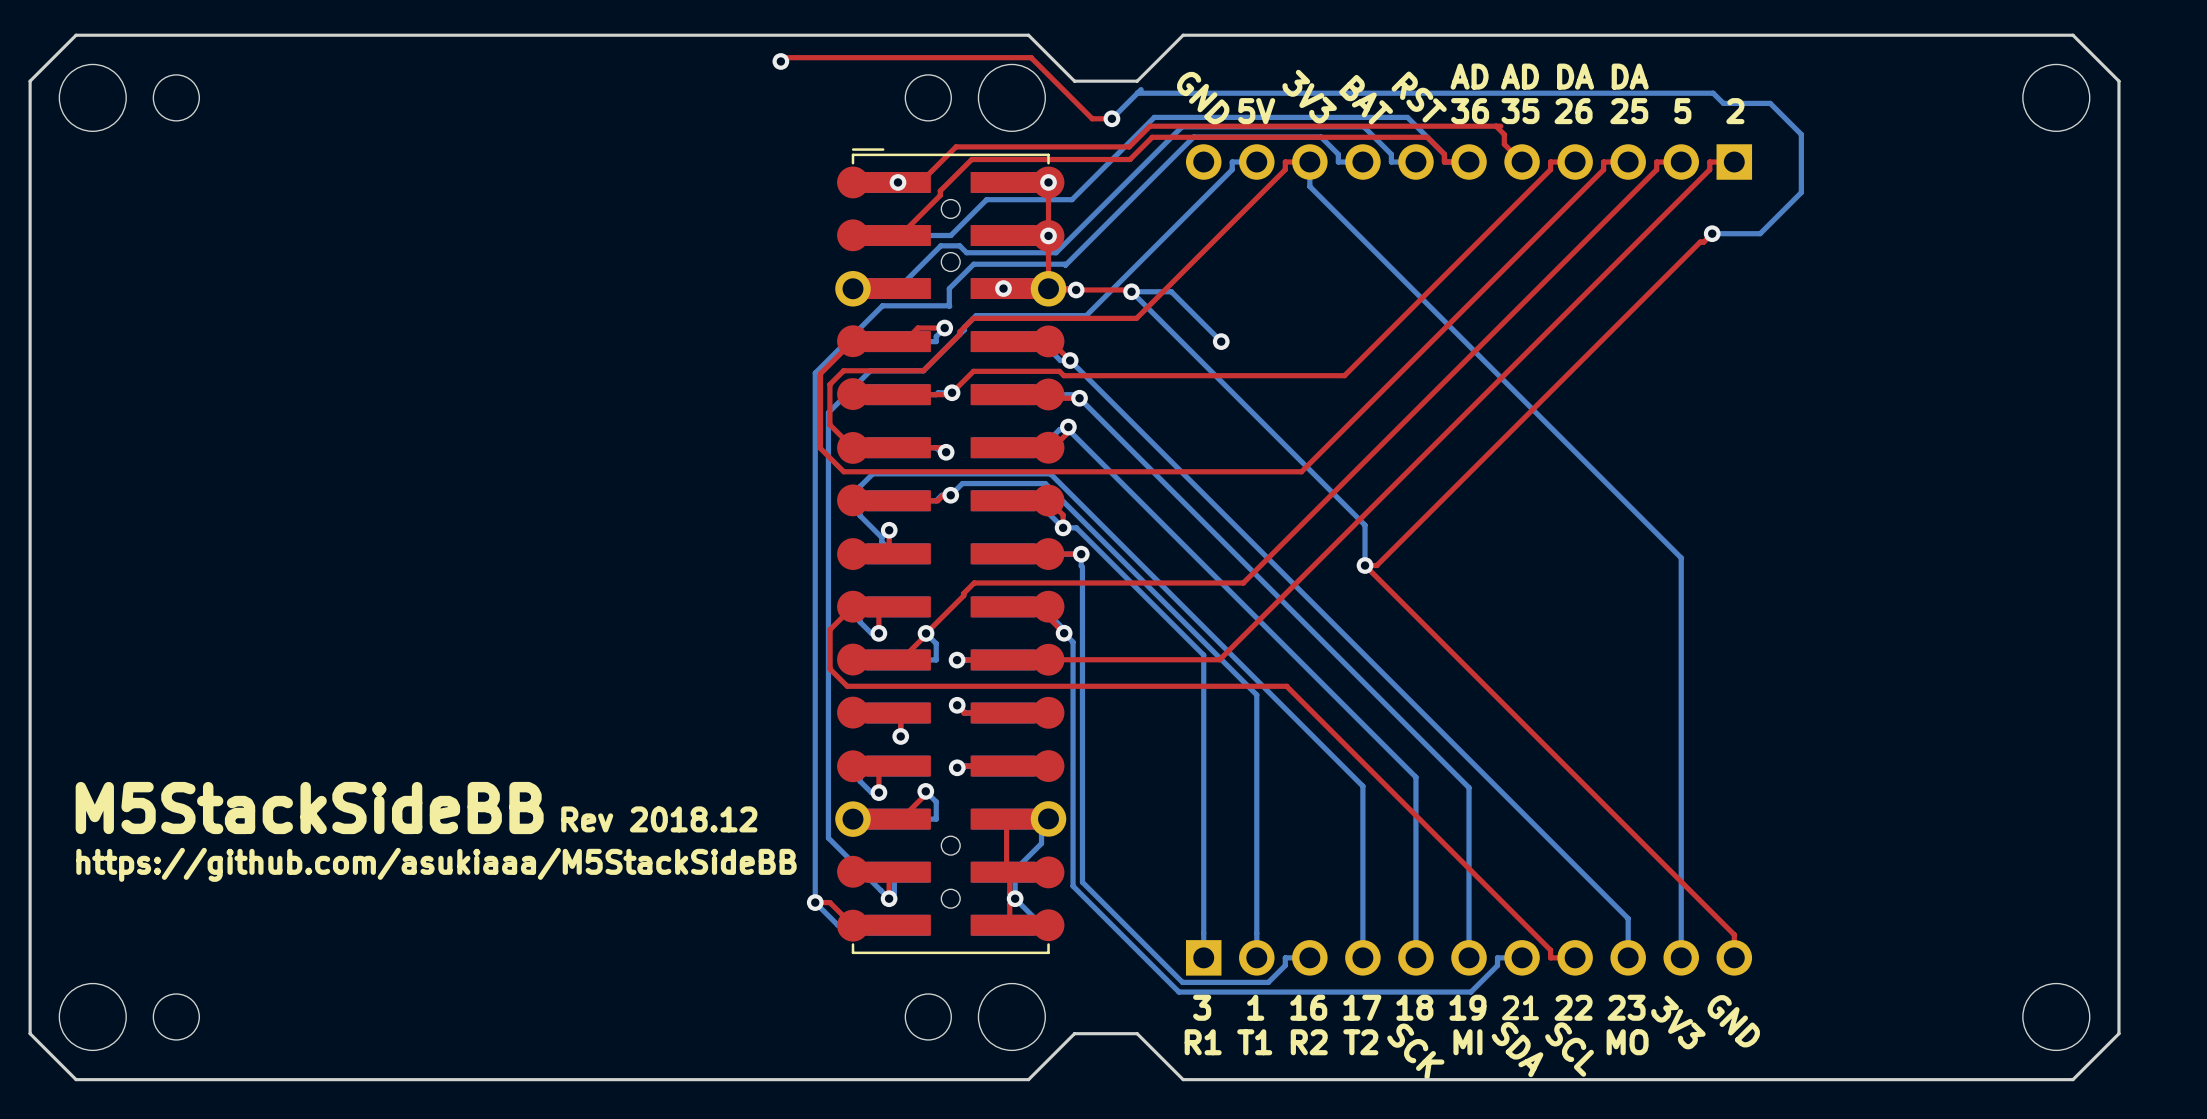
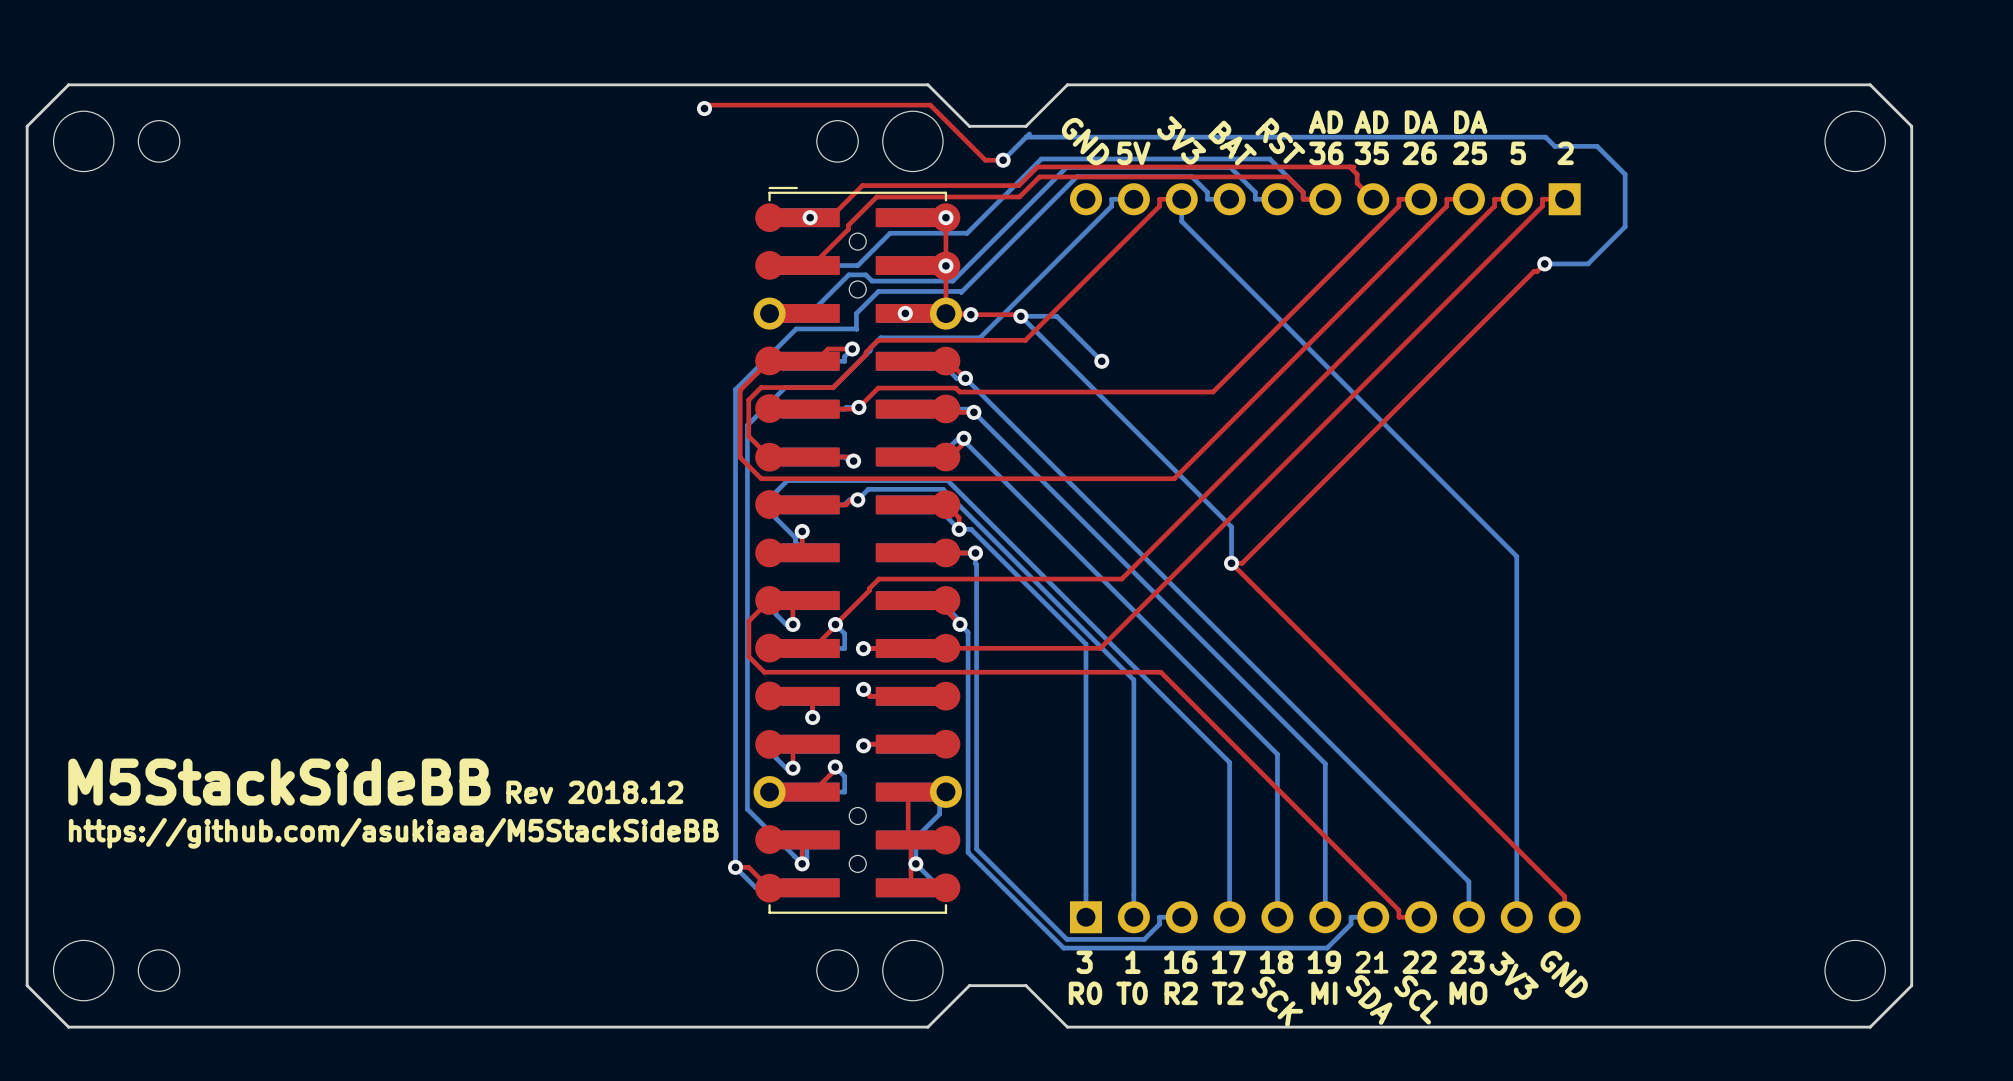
text: R1 (1203, 1042) -> R0 (1085, 993)
text: T1 (1254, 1042) -> T0 (1132, 993)

